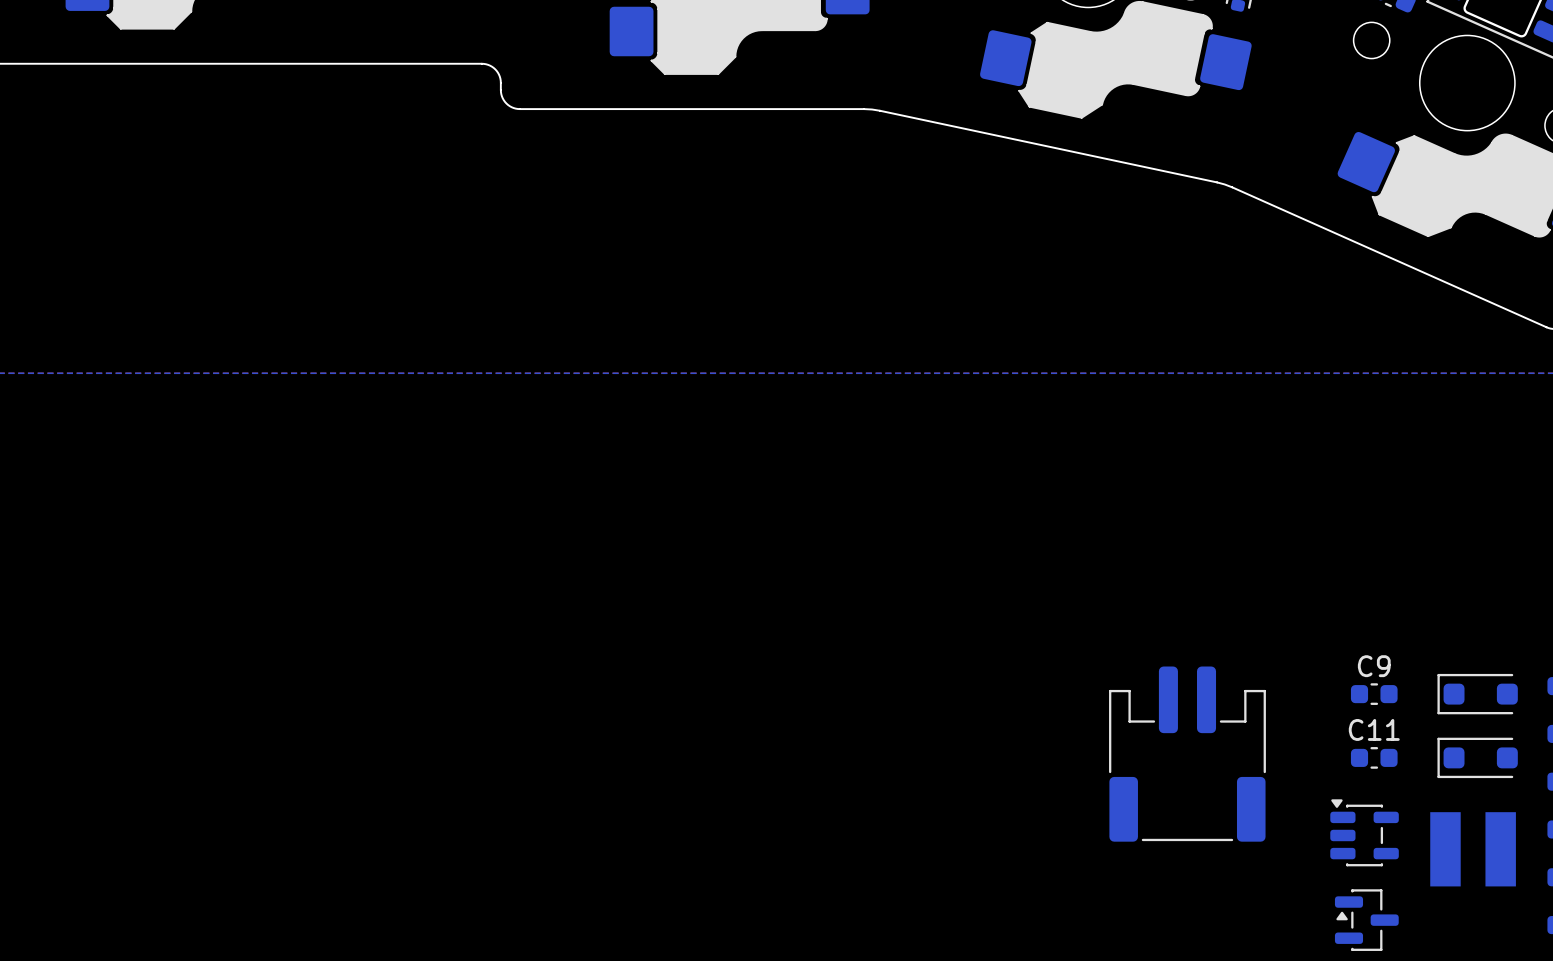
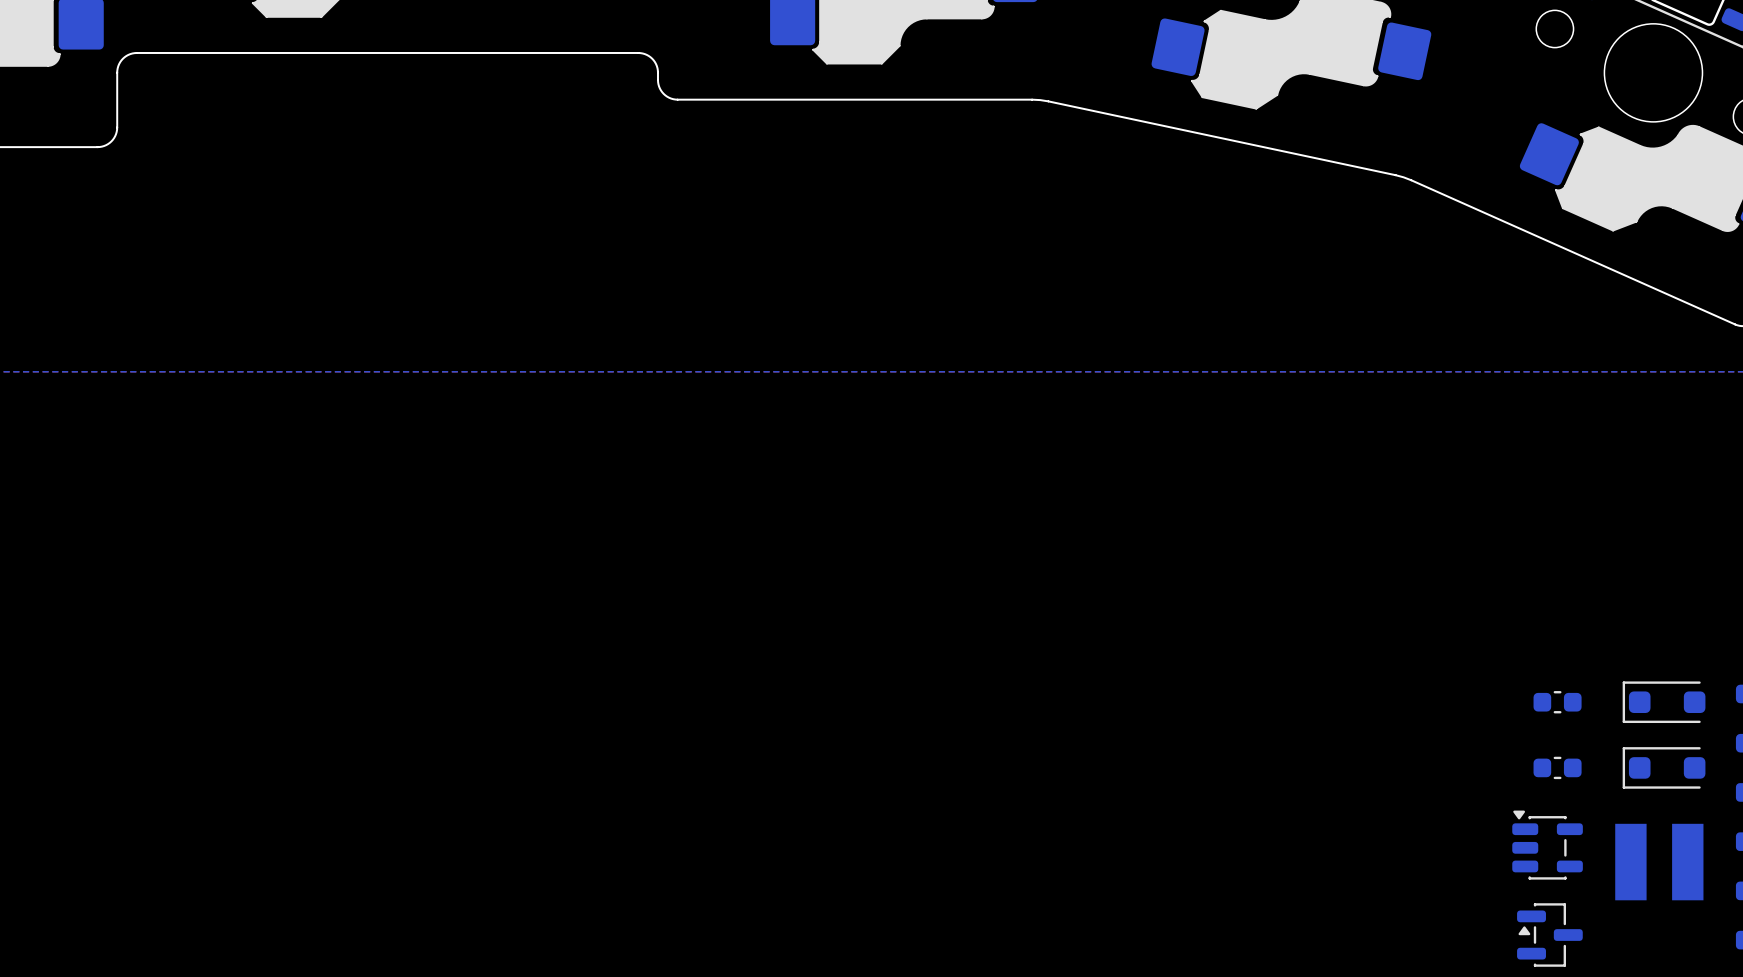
C9 name: C9 (1374, 666) -> none
C11 name: C11 (1374, 729) -> none
part: (1187, 754) -> none

